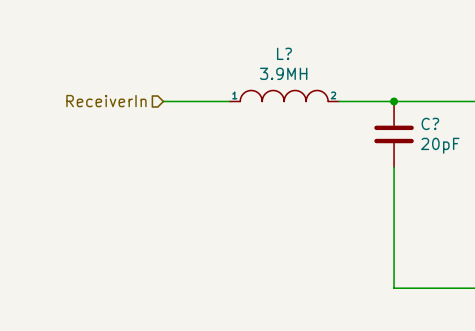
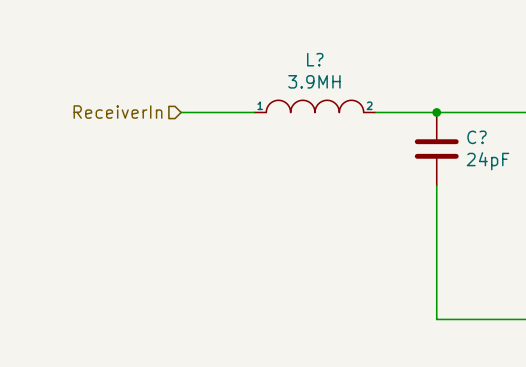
C? value: 20pF (440, 145) -> 24pF (488, 161)

